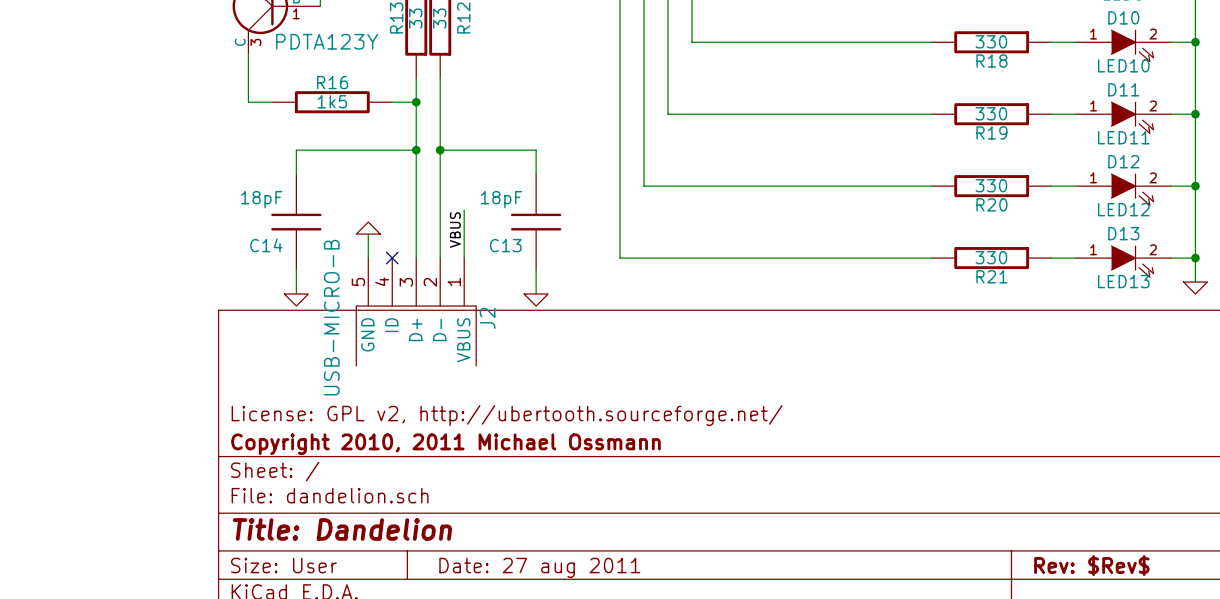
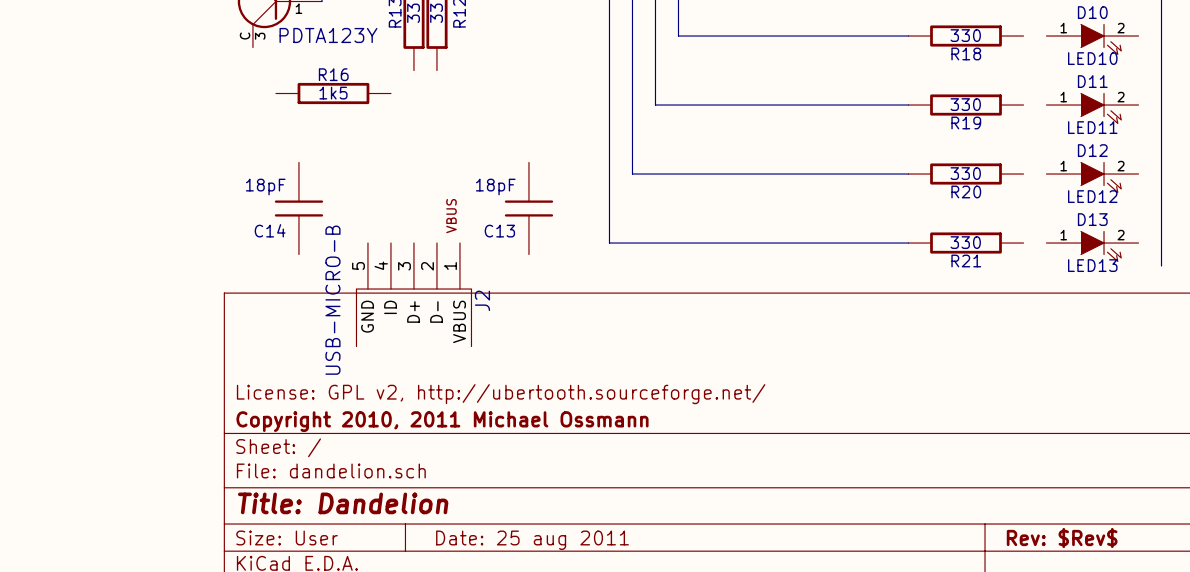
wire: (1051, 42) (1075, 42) -> none
wire: (1171, 42) (1195, 42) -> none
junction: (1195, 42) -> none
wire: (248, 54) (248, 102) (272, 102) -> none
wire: (416, 78) (416, 258) -> none
wire: (440, 78) (440, 258) -> none
wire: (392, 102) (416, 102) -> none
junction: (416, 102) -> none
wire: (1051, 114) (1075, 114) -> none
wire: (1171, 114) (1195, 114) -> none
junction: (1195, 114) -> none
wire: (416, 150) (296, 150) (296, 174) -> none
junction: (416, 150) -> none
wire: (440, 150) (536, 150) (536, 174) -> none
junction: (440, 150) -> none
wire: (1051, 186) (1075, 186) -> none
wire: (1171, 186) (1195, 186) -> none
junction: (1195, 186) -> none
wire: (464, 210) (464, 258) -> none
power symbol: (368, 228) -> none
wire: (368, 234) (368, 258) -> none
no-connect mark: (392, 258) -> none
wire: (1051, 258) (1075, 258) -> none
wire: (1171, 258) (1195, 258) -> none
junction: (1195, 258) -> none
wire: (296, 270) (296, 294) -> none
wire: (536, 270) (536, 294) -> none
power symbol: (1195, 288) -> none
power symbol: (296, 300) -> none
power symbol: (536, 300) -> none
title block: Date: 27 aug 2011 (539, 567) -> Date: 25 aug 2011 (532, 540)

